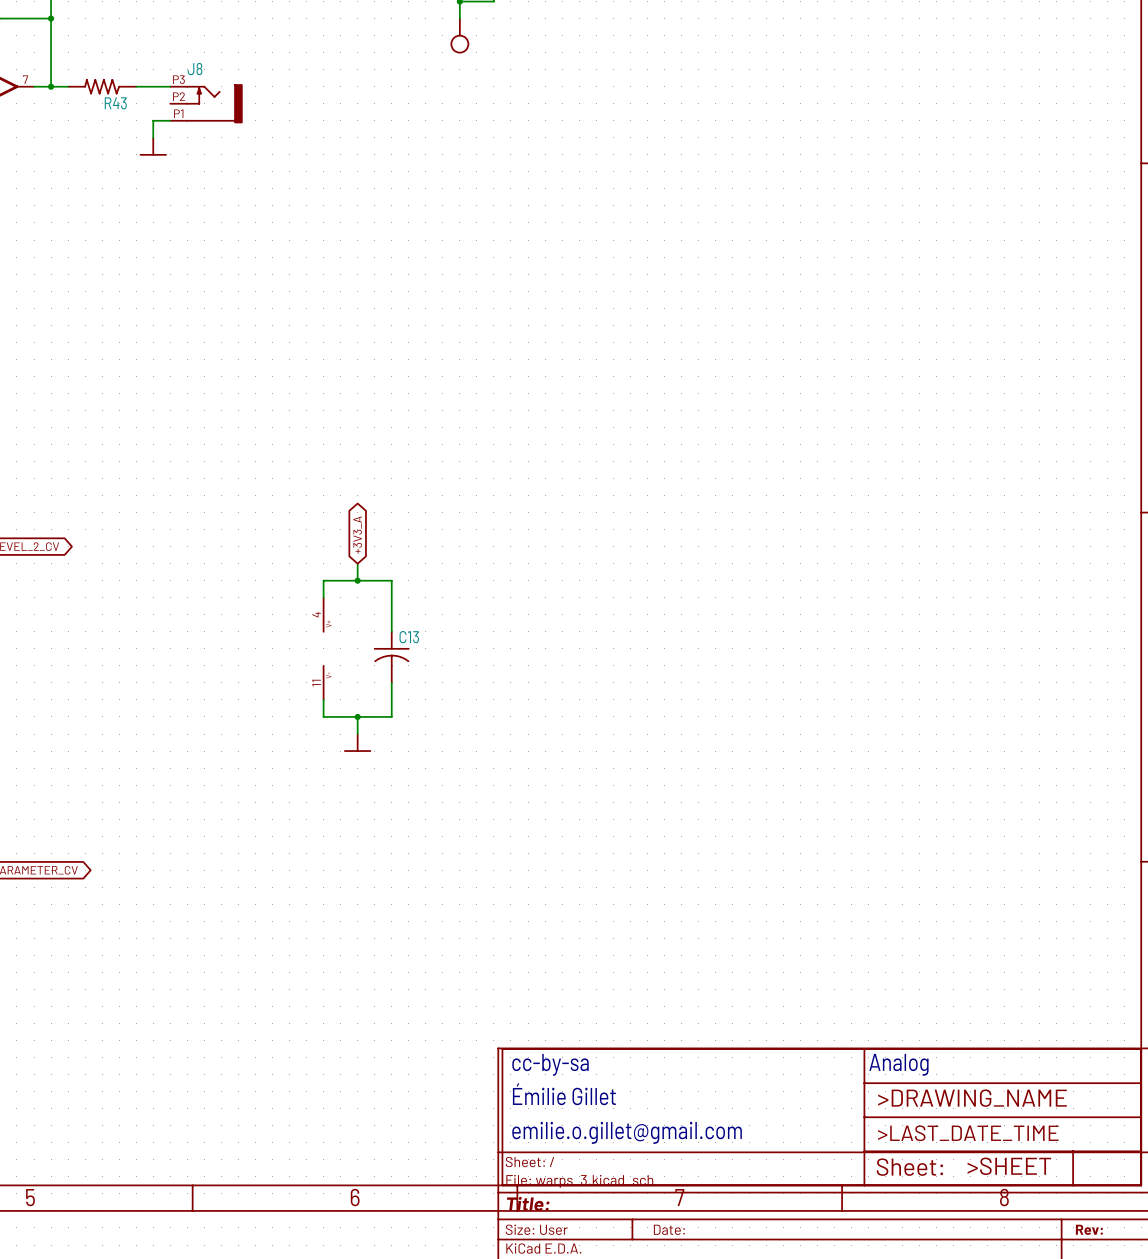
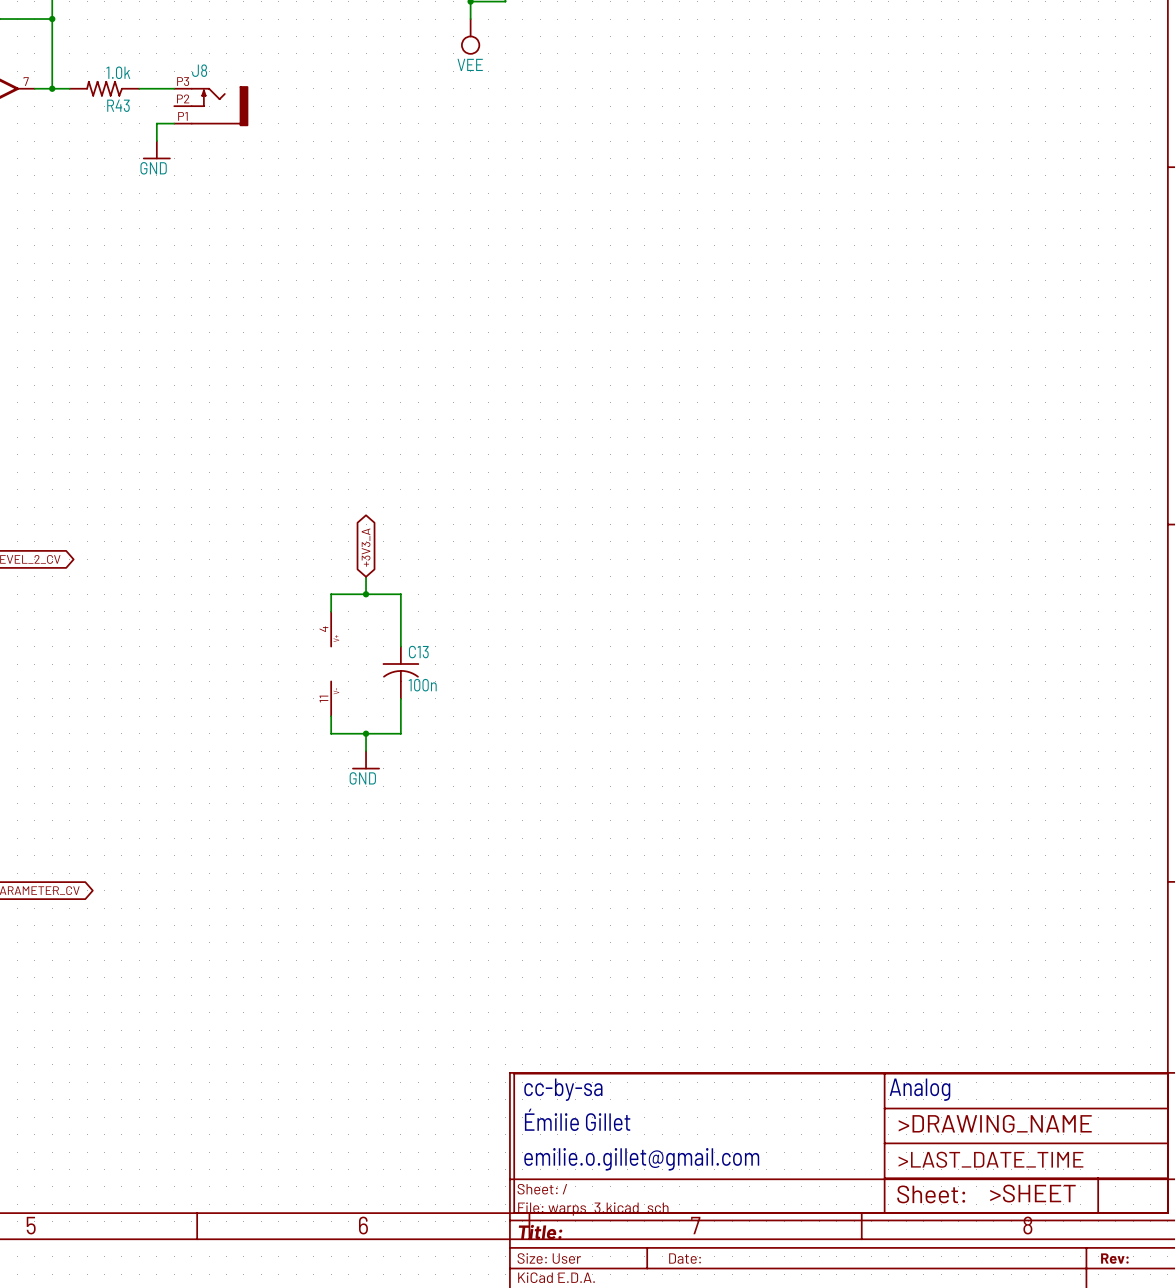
power symbol text: none -> VEE (470, 64)
R43 value: none -> 1.0k (118, 72)
power symbol text: none -> GND (153, 168)
C13 value: none -> 100n (422, 685)
power symbol text: none -> GND (362, 778)

